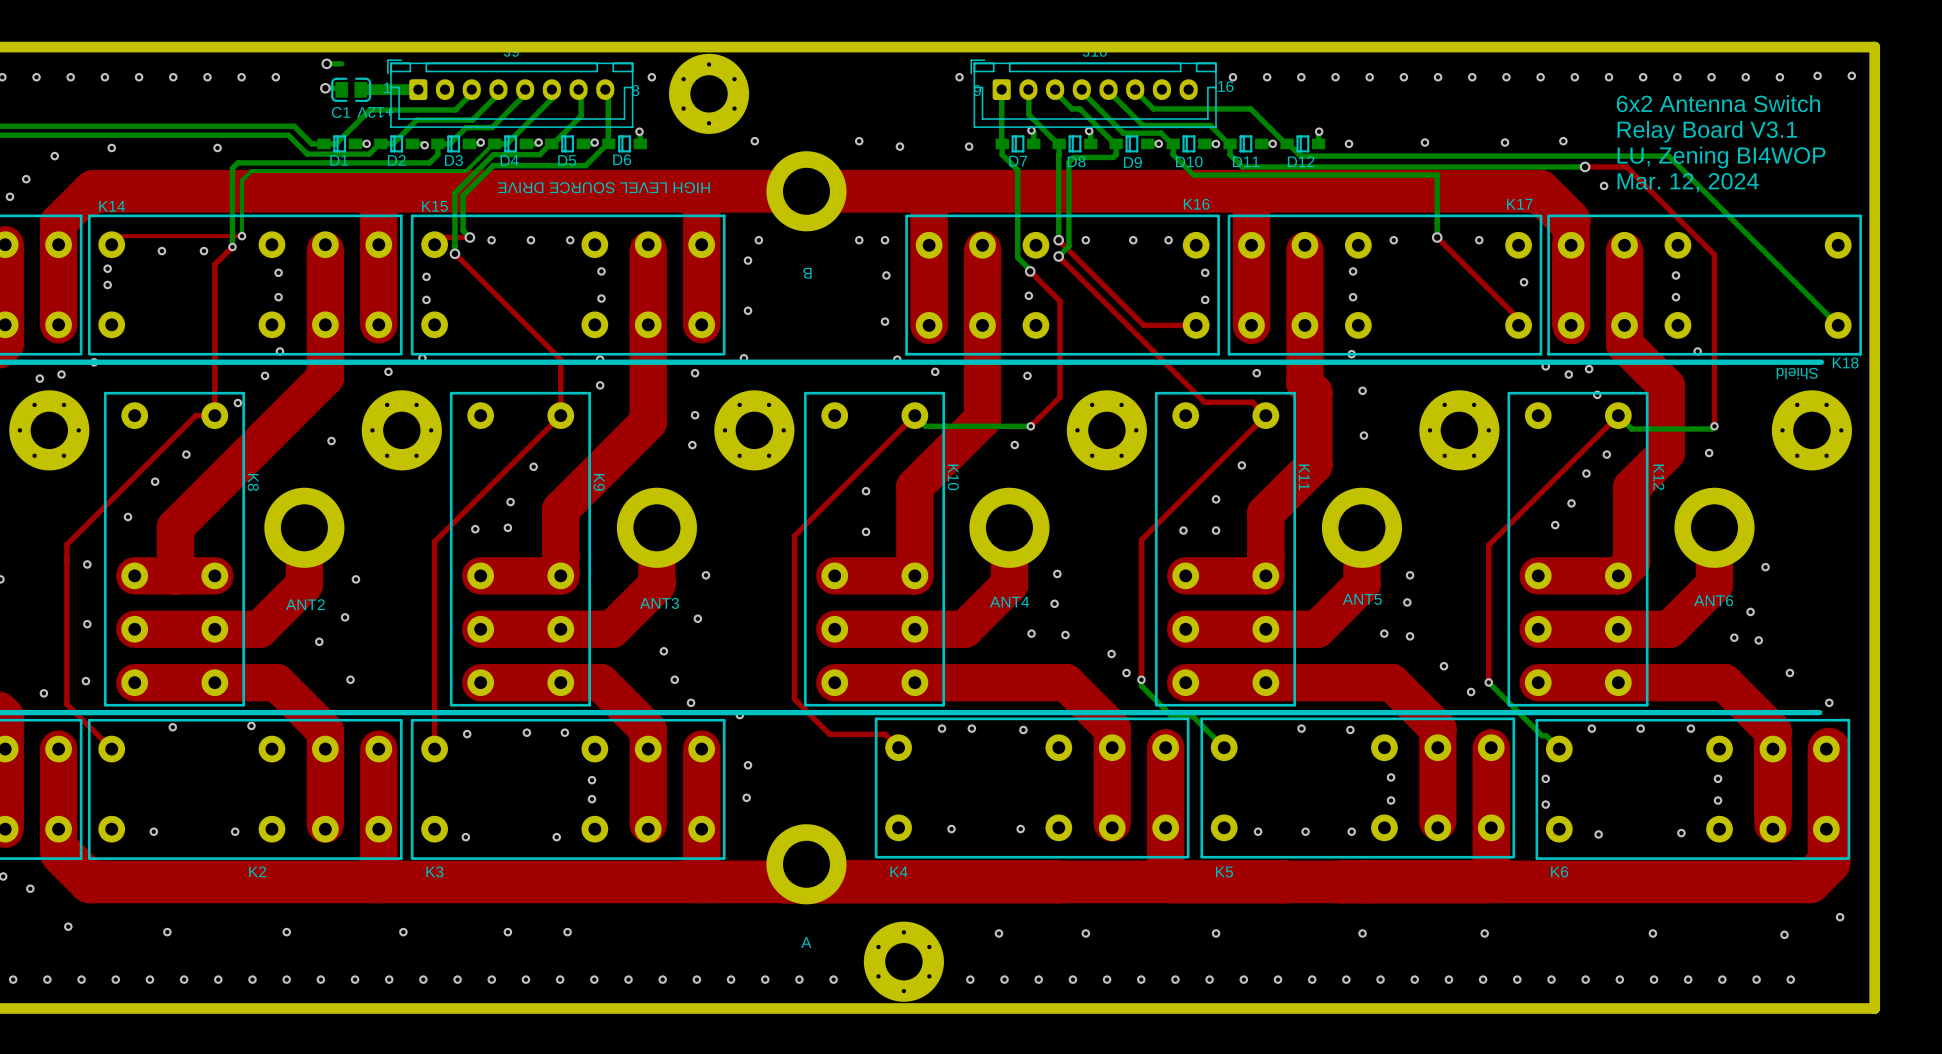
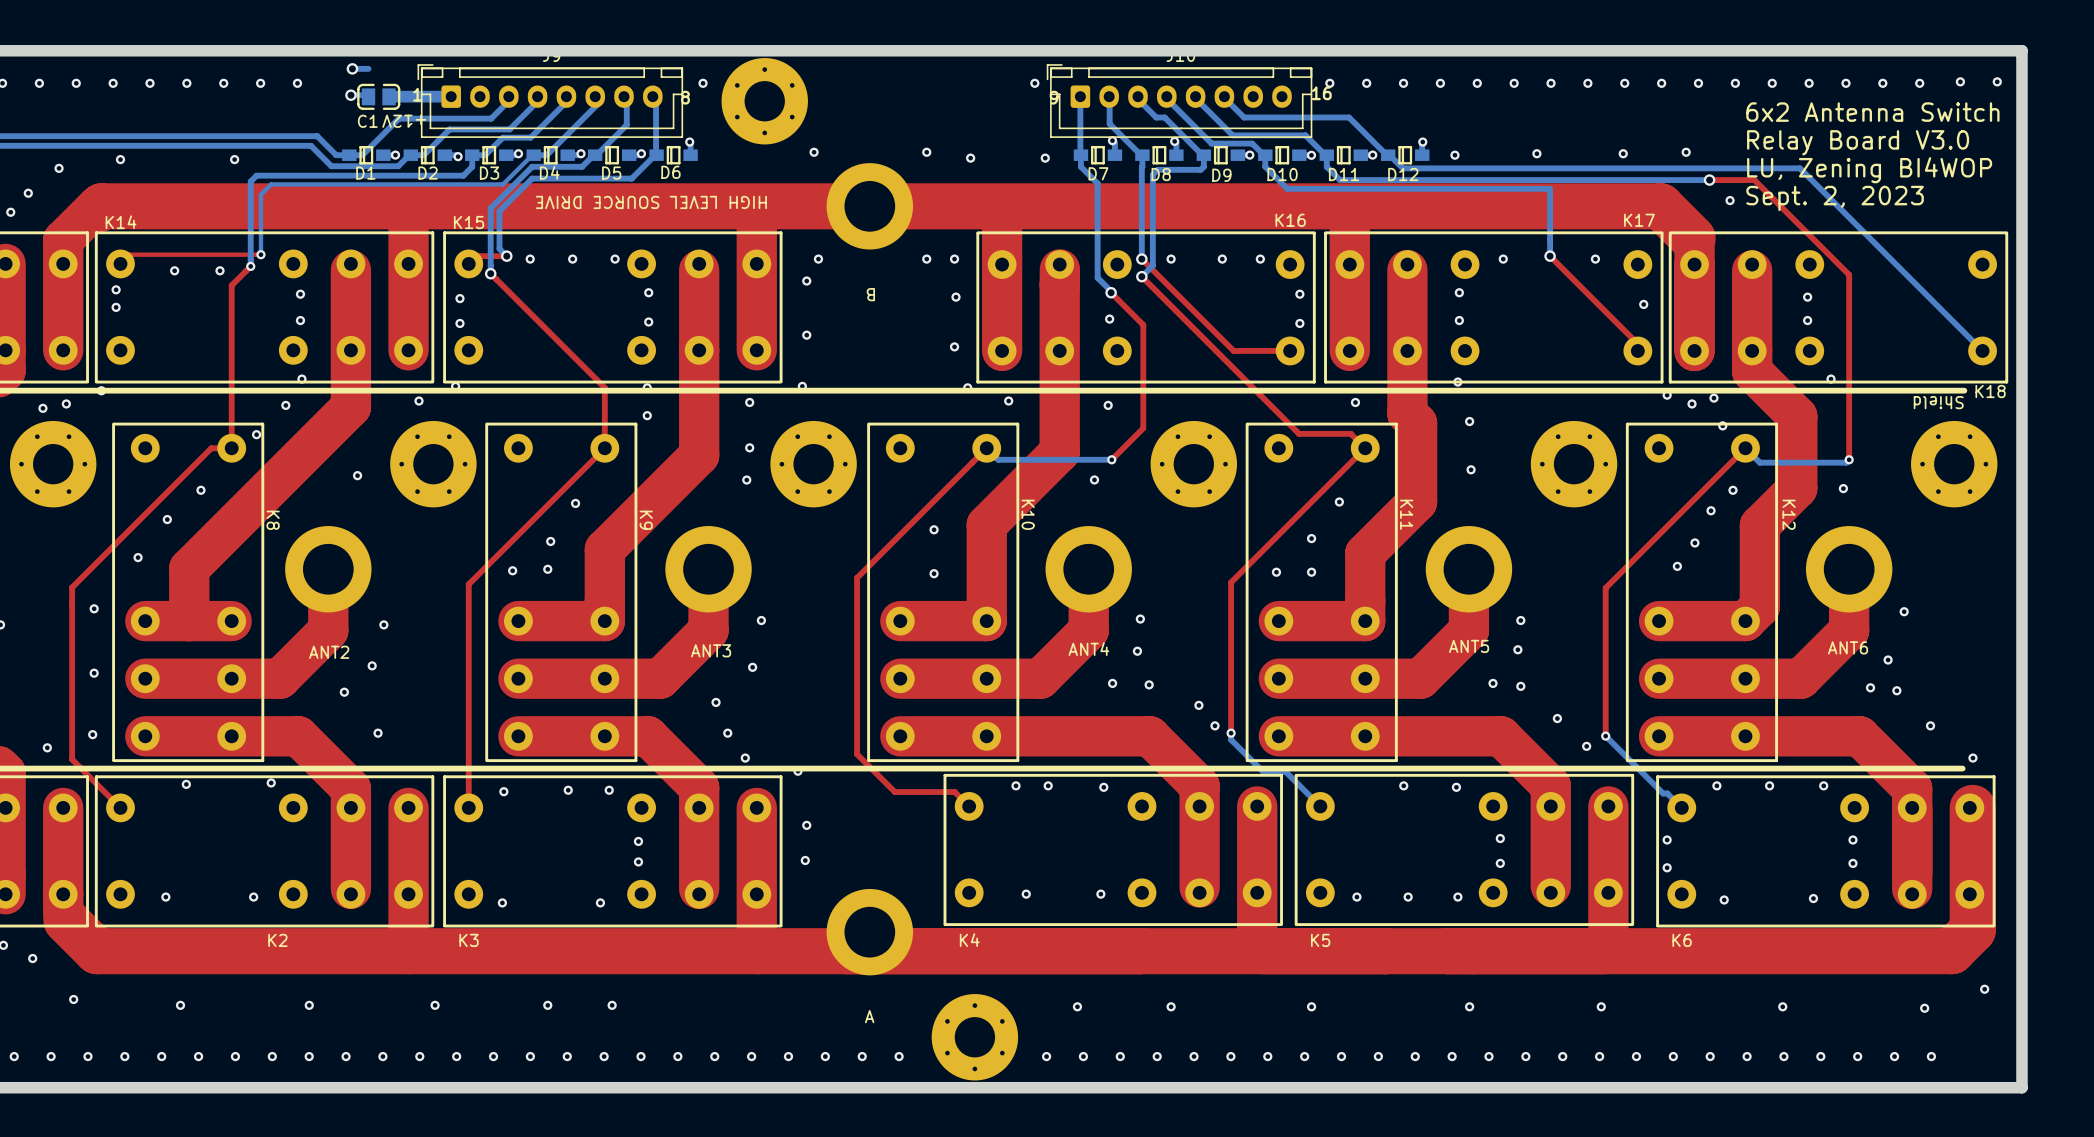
text: Relay Board V3.1 (1707, 131) -> Relay Board V3.0 (1858, 142)
text: Mar. 12, 2024 (1688, 182) -> Sept. 2, 2023 (1835, 198)

